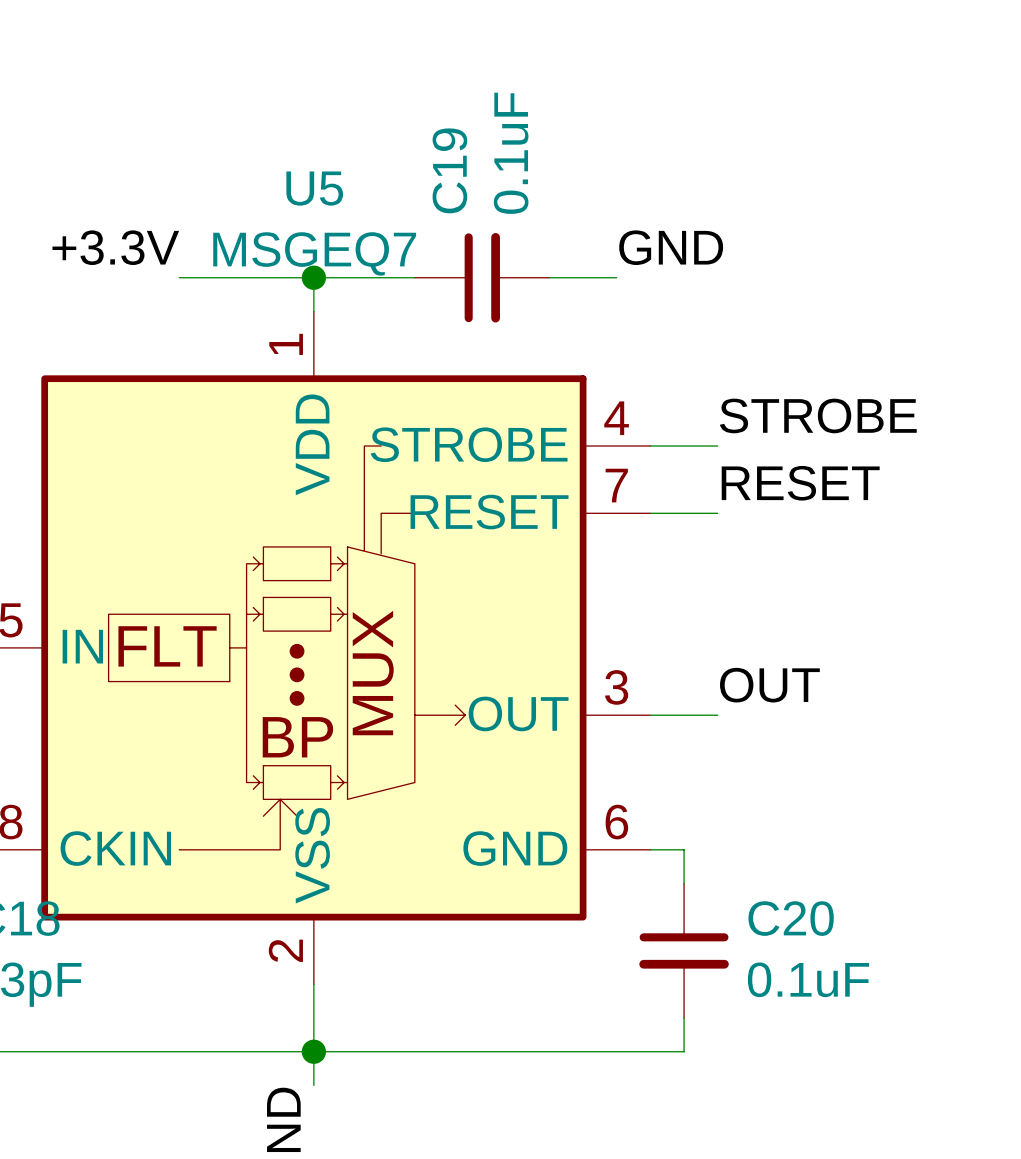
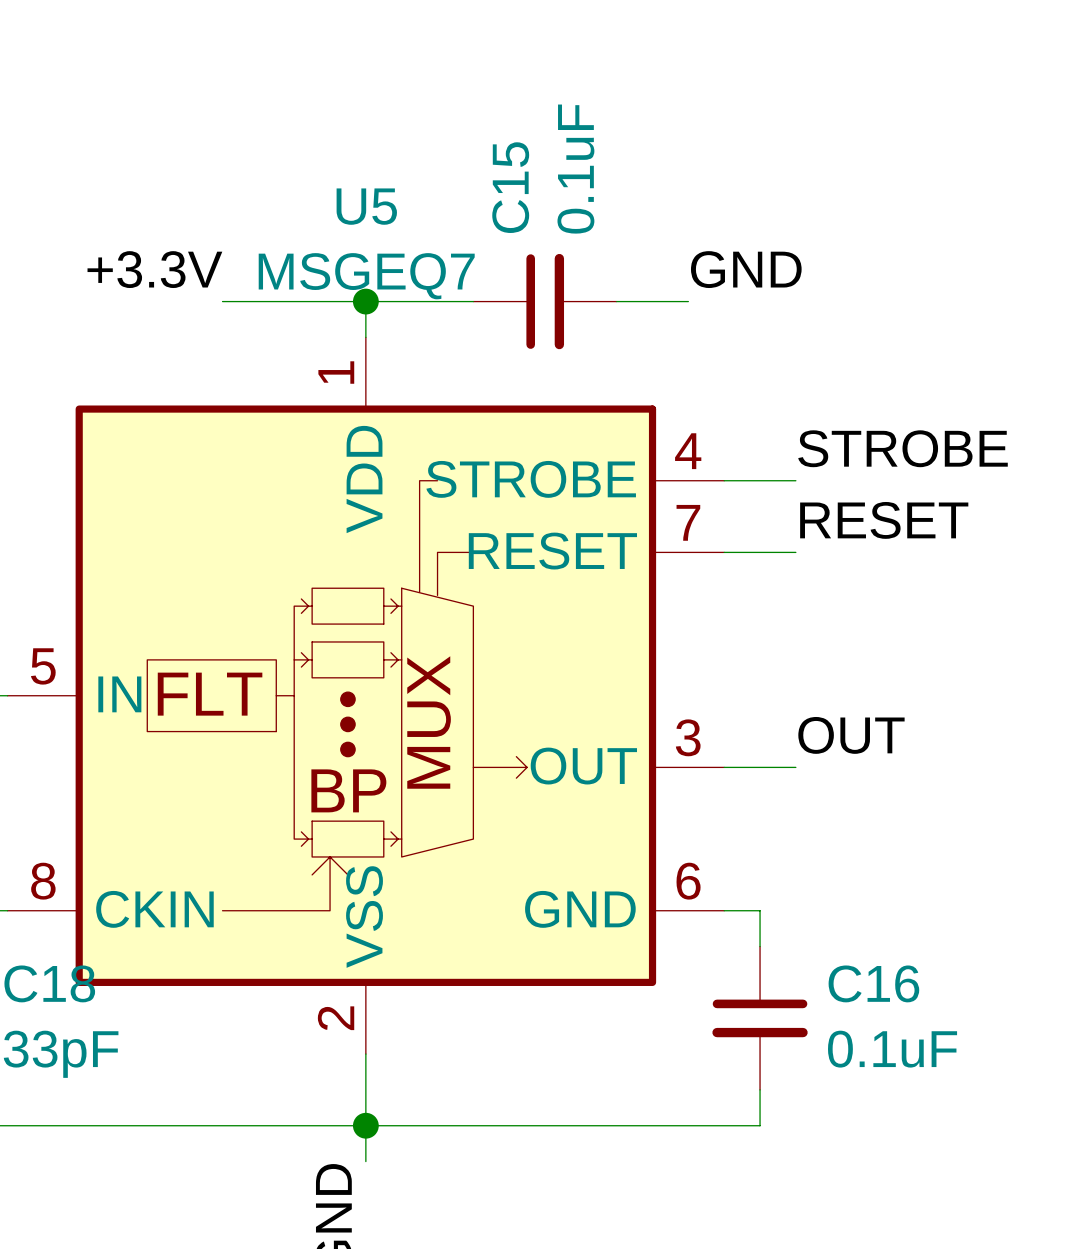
C19 name: C19 (449, 170) -> C15 (510, 187)
C20 name: C20 (791, 918) -> C16 (873, 983)

